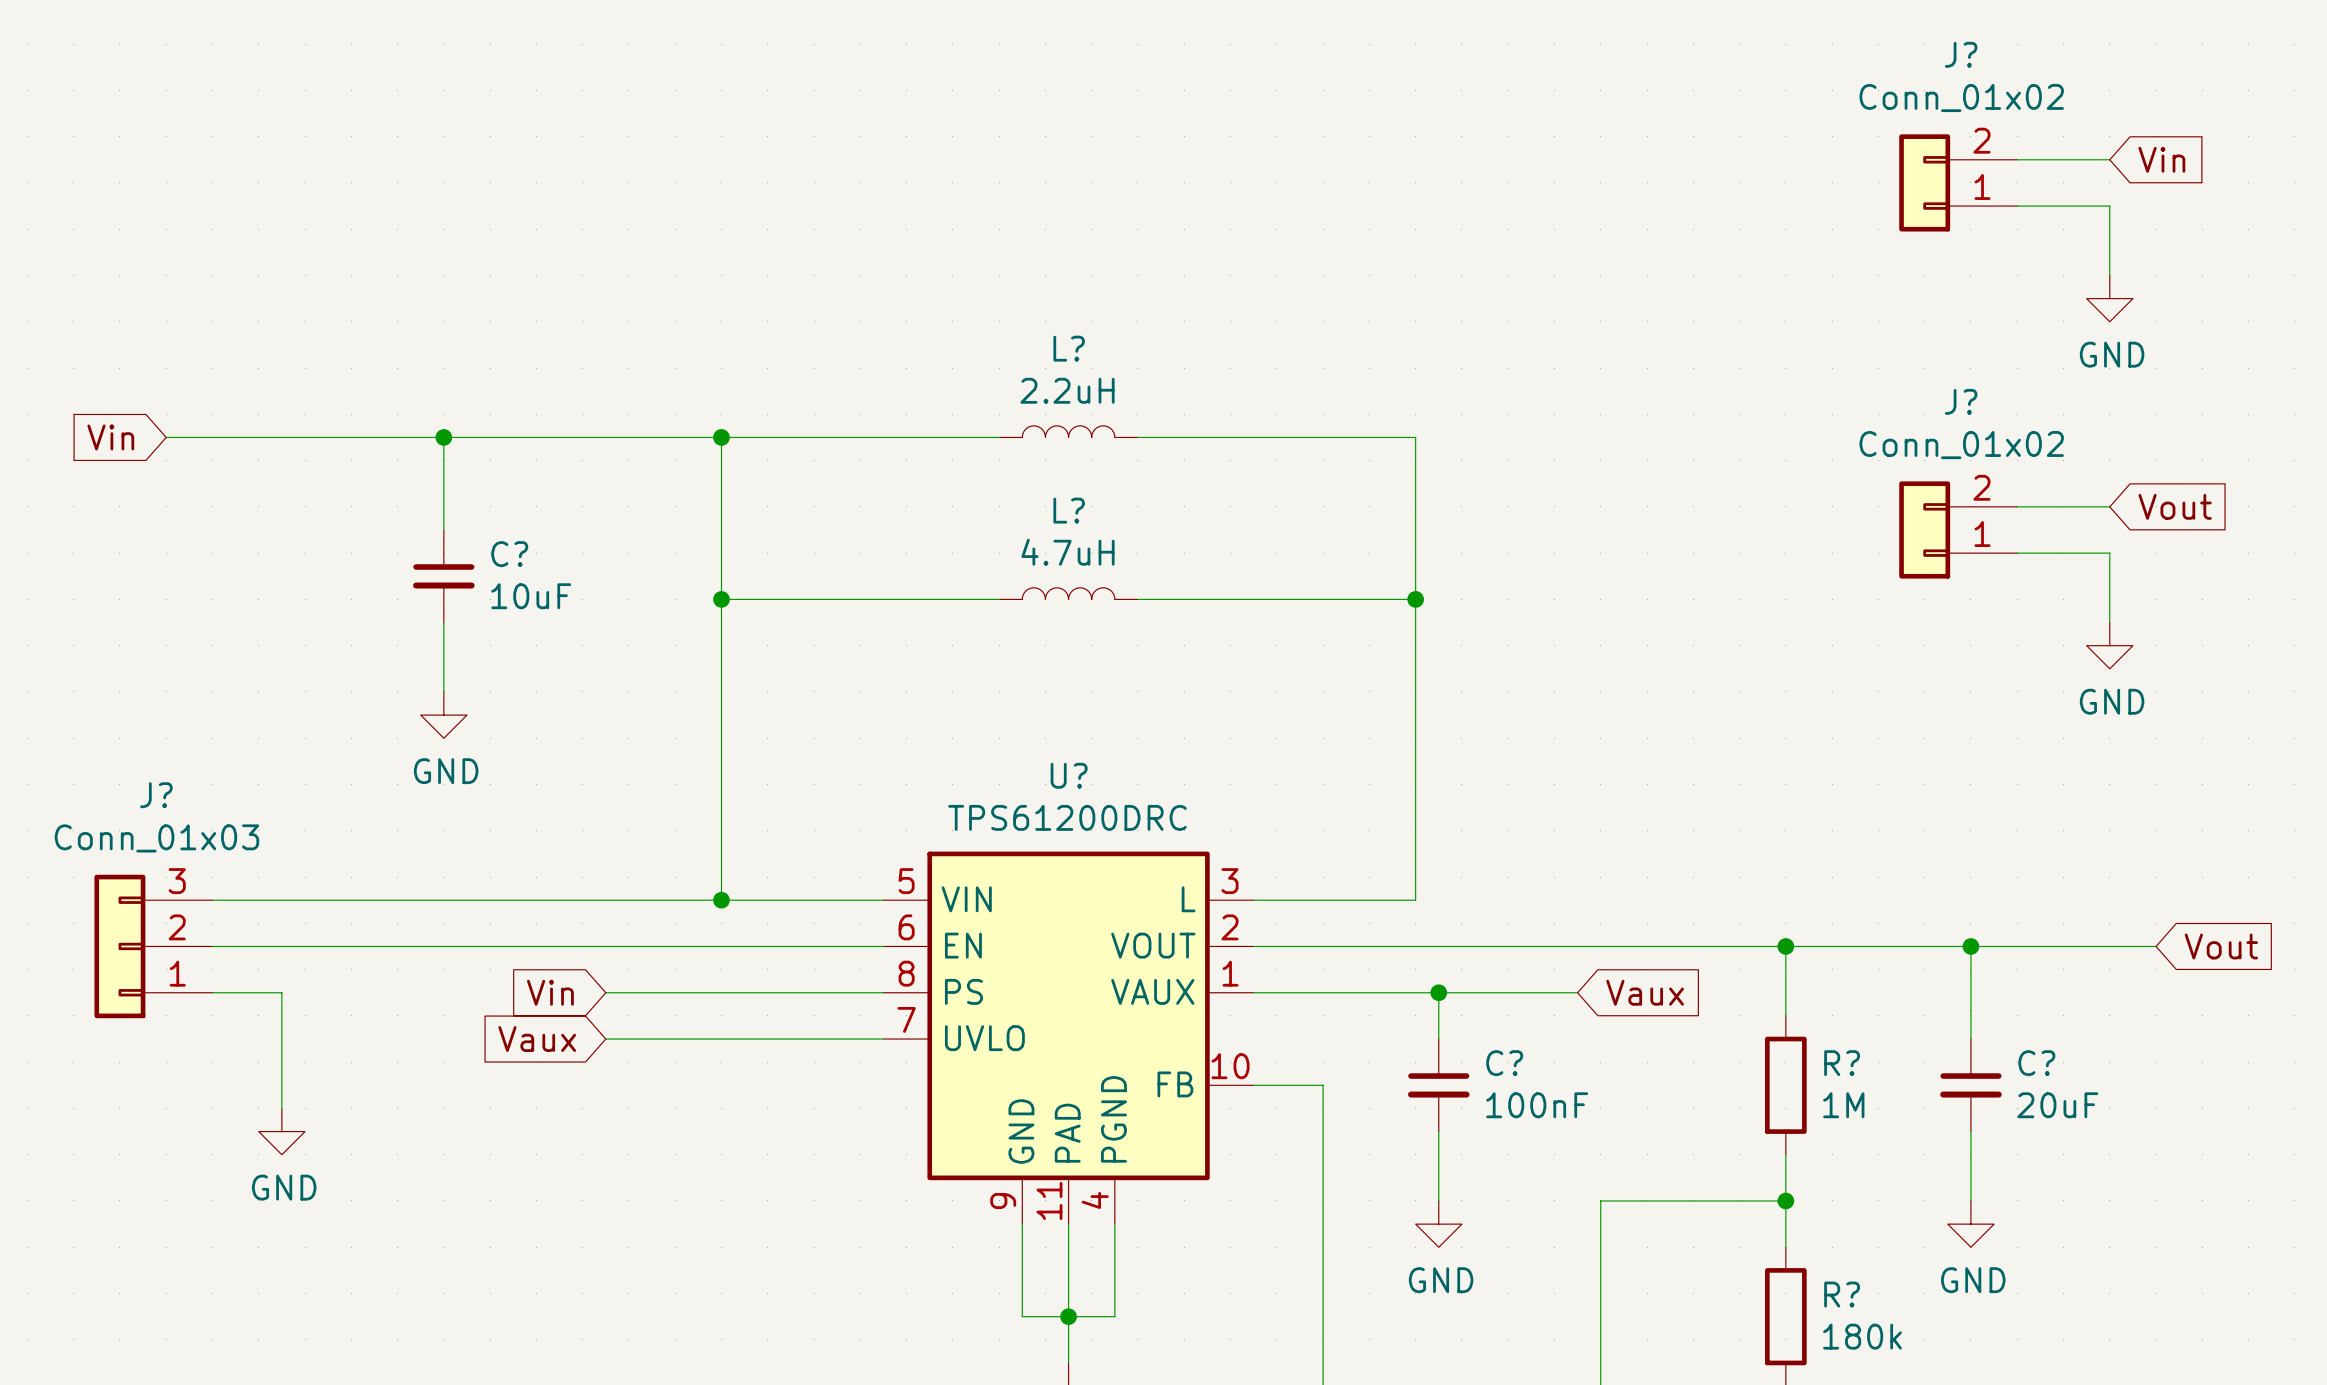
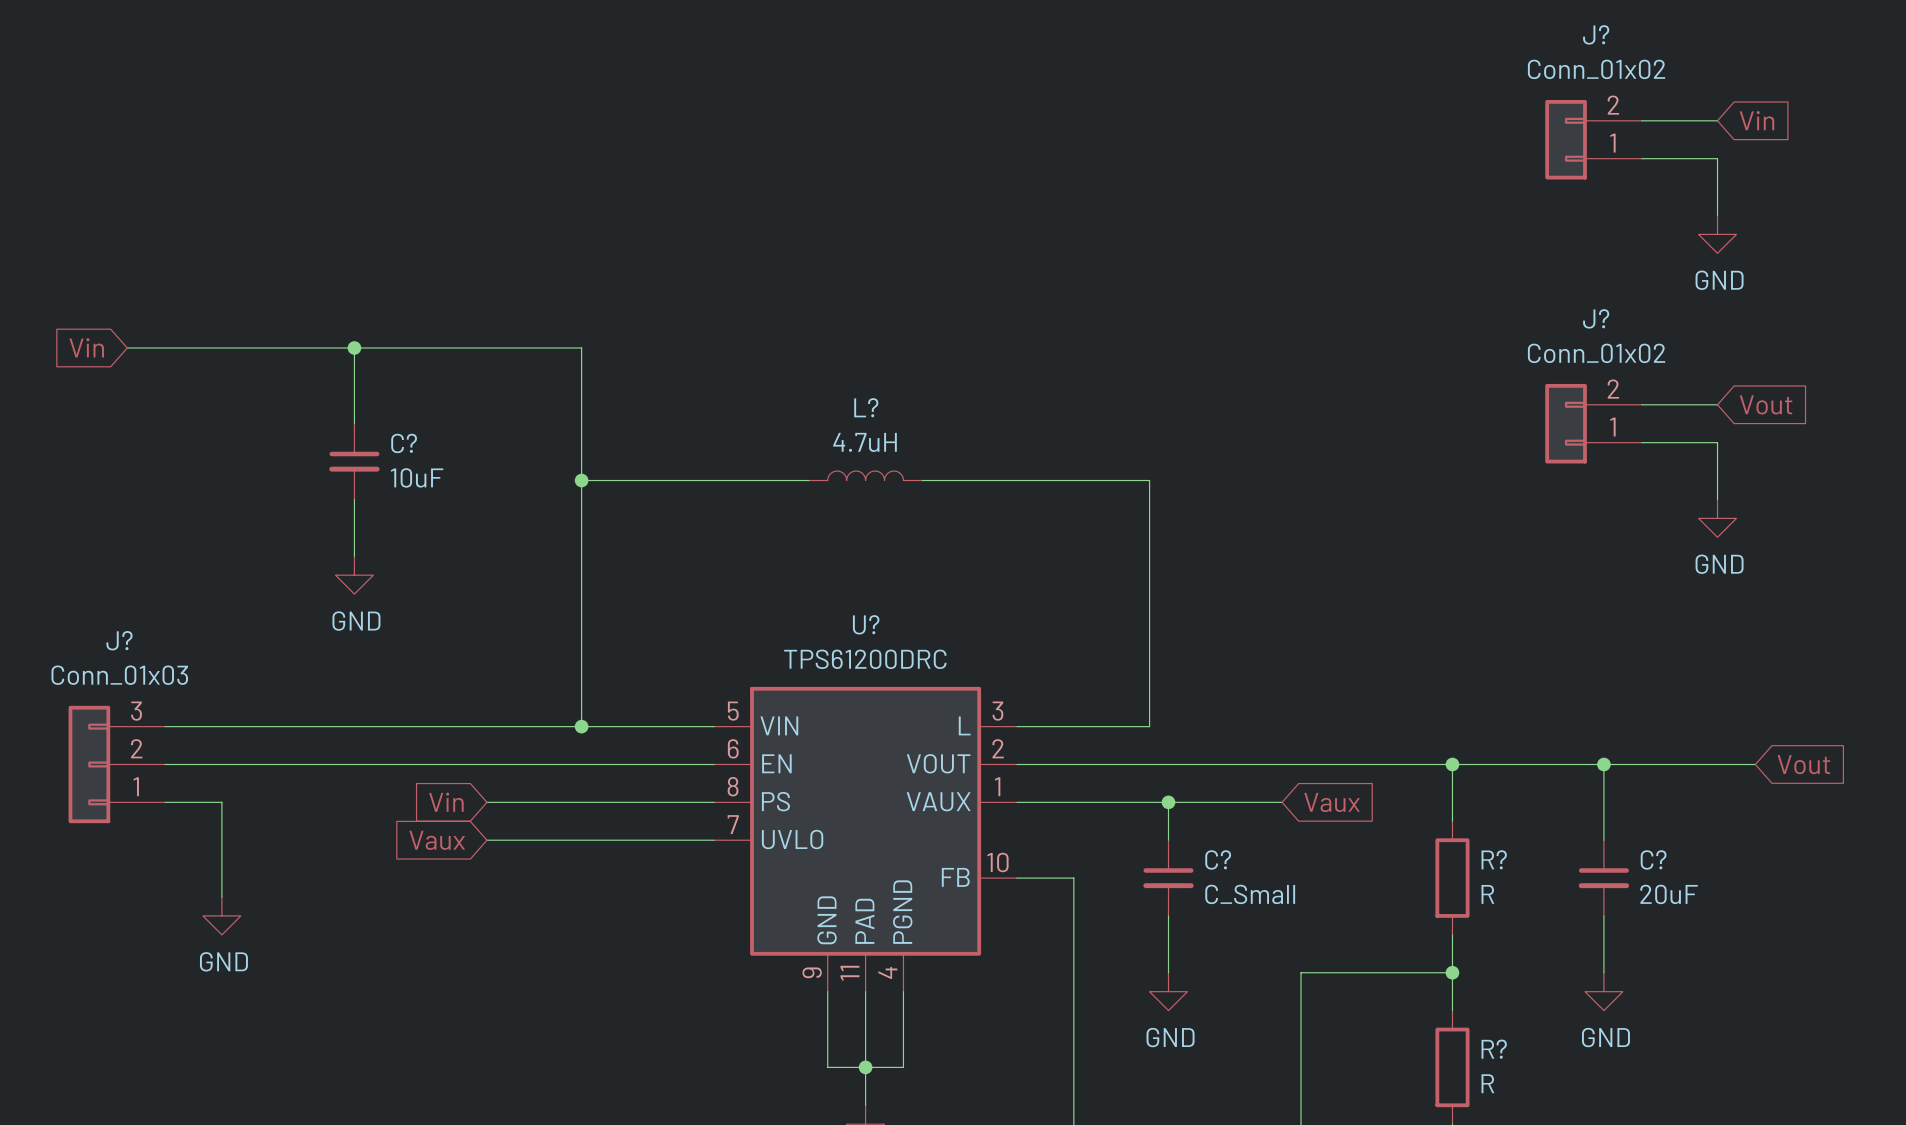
L?: 2.2uH (1068, 431) -> none
wire: (721, 437) (999, 437) -> none
junction: (721, 437) -> none
wire: (1137, 437) (1415, 437) (1415, 599) -> none
junction: (1415, 599) -> none
C? value: 100nF (1537, 1105) -> C_Small (1250, 894)
R? value: 1M (1843, 1105) -> R (1487, 894)
R? value: 180k (1862, 1336) -> R (1487, 1083)

